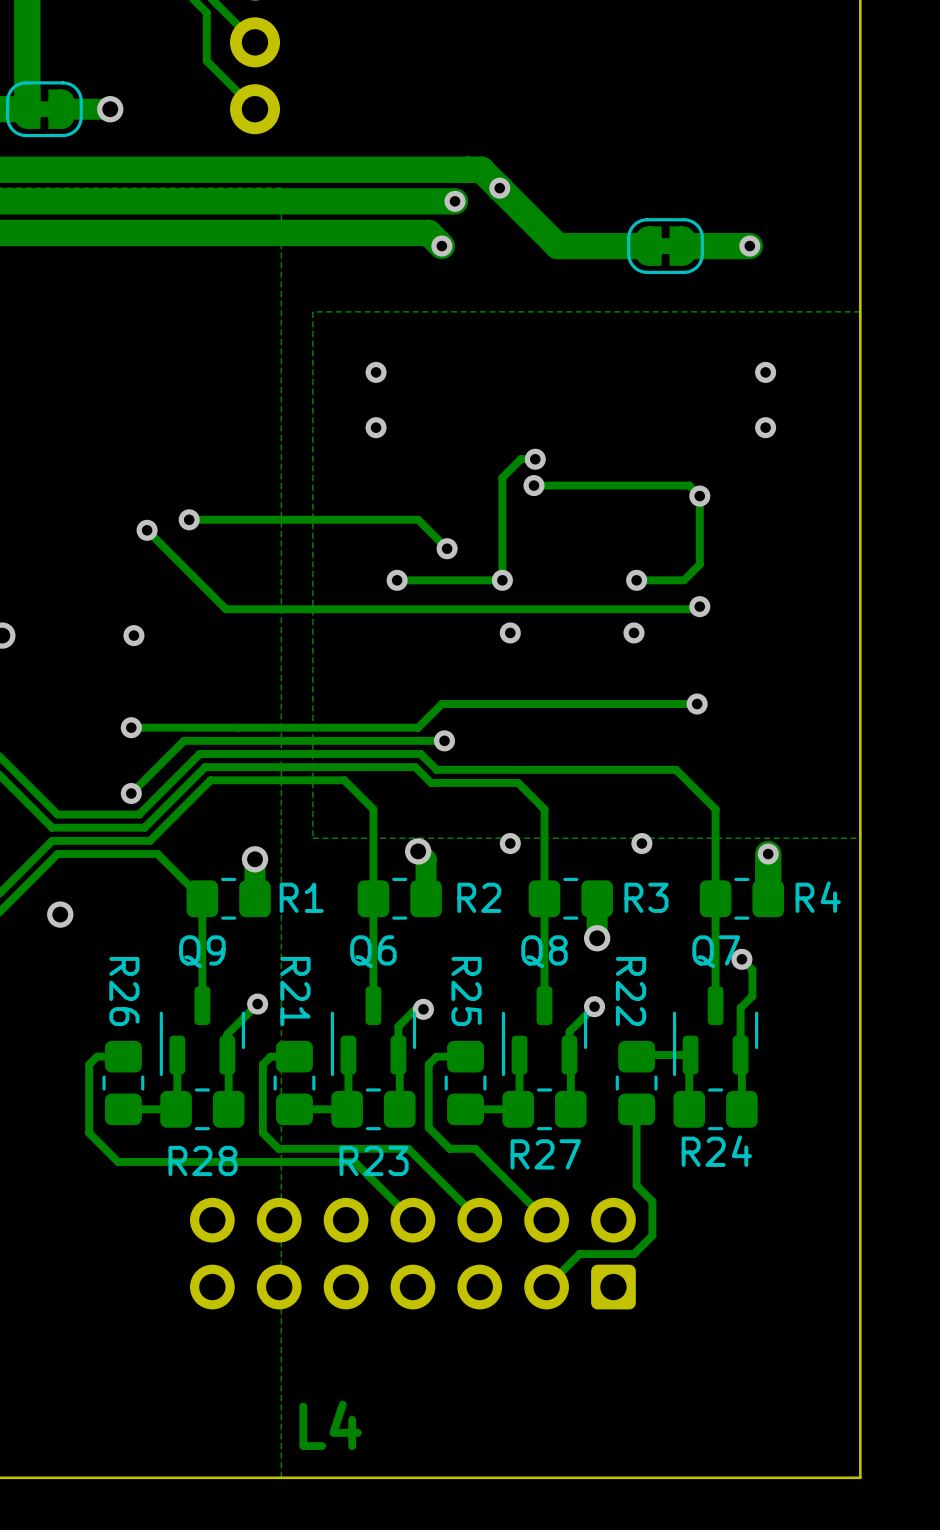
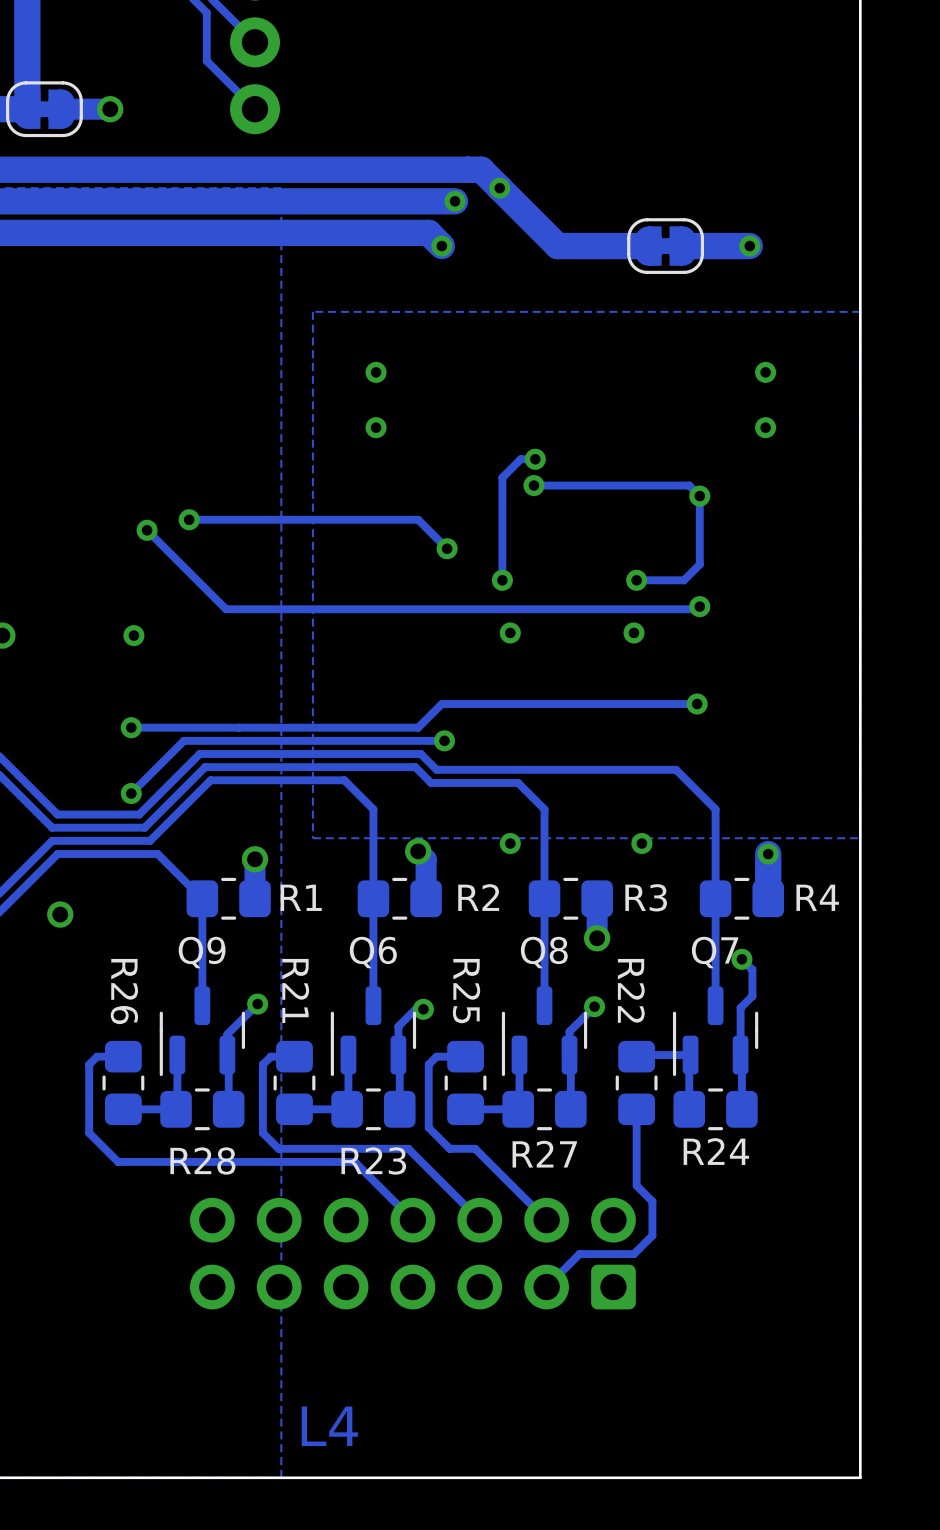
via: (397, 580) -> none
track: (502, 580) (397, 580) -> none

